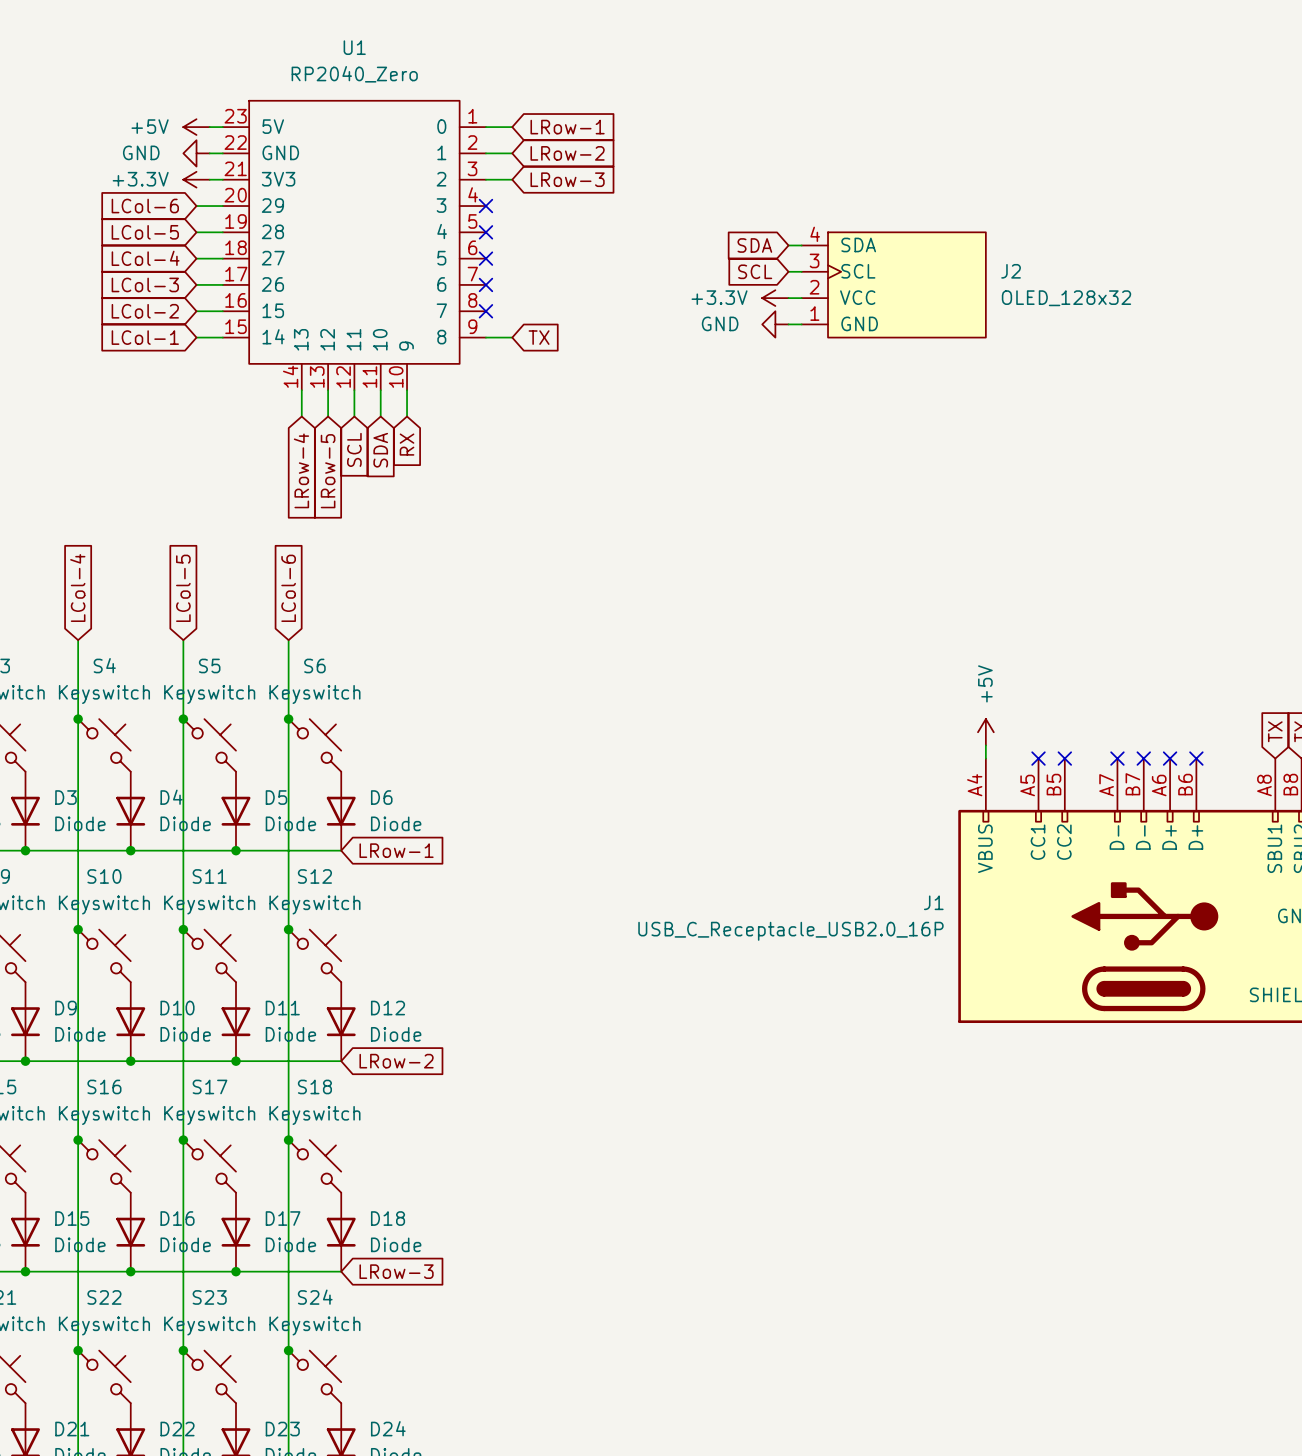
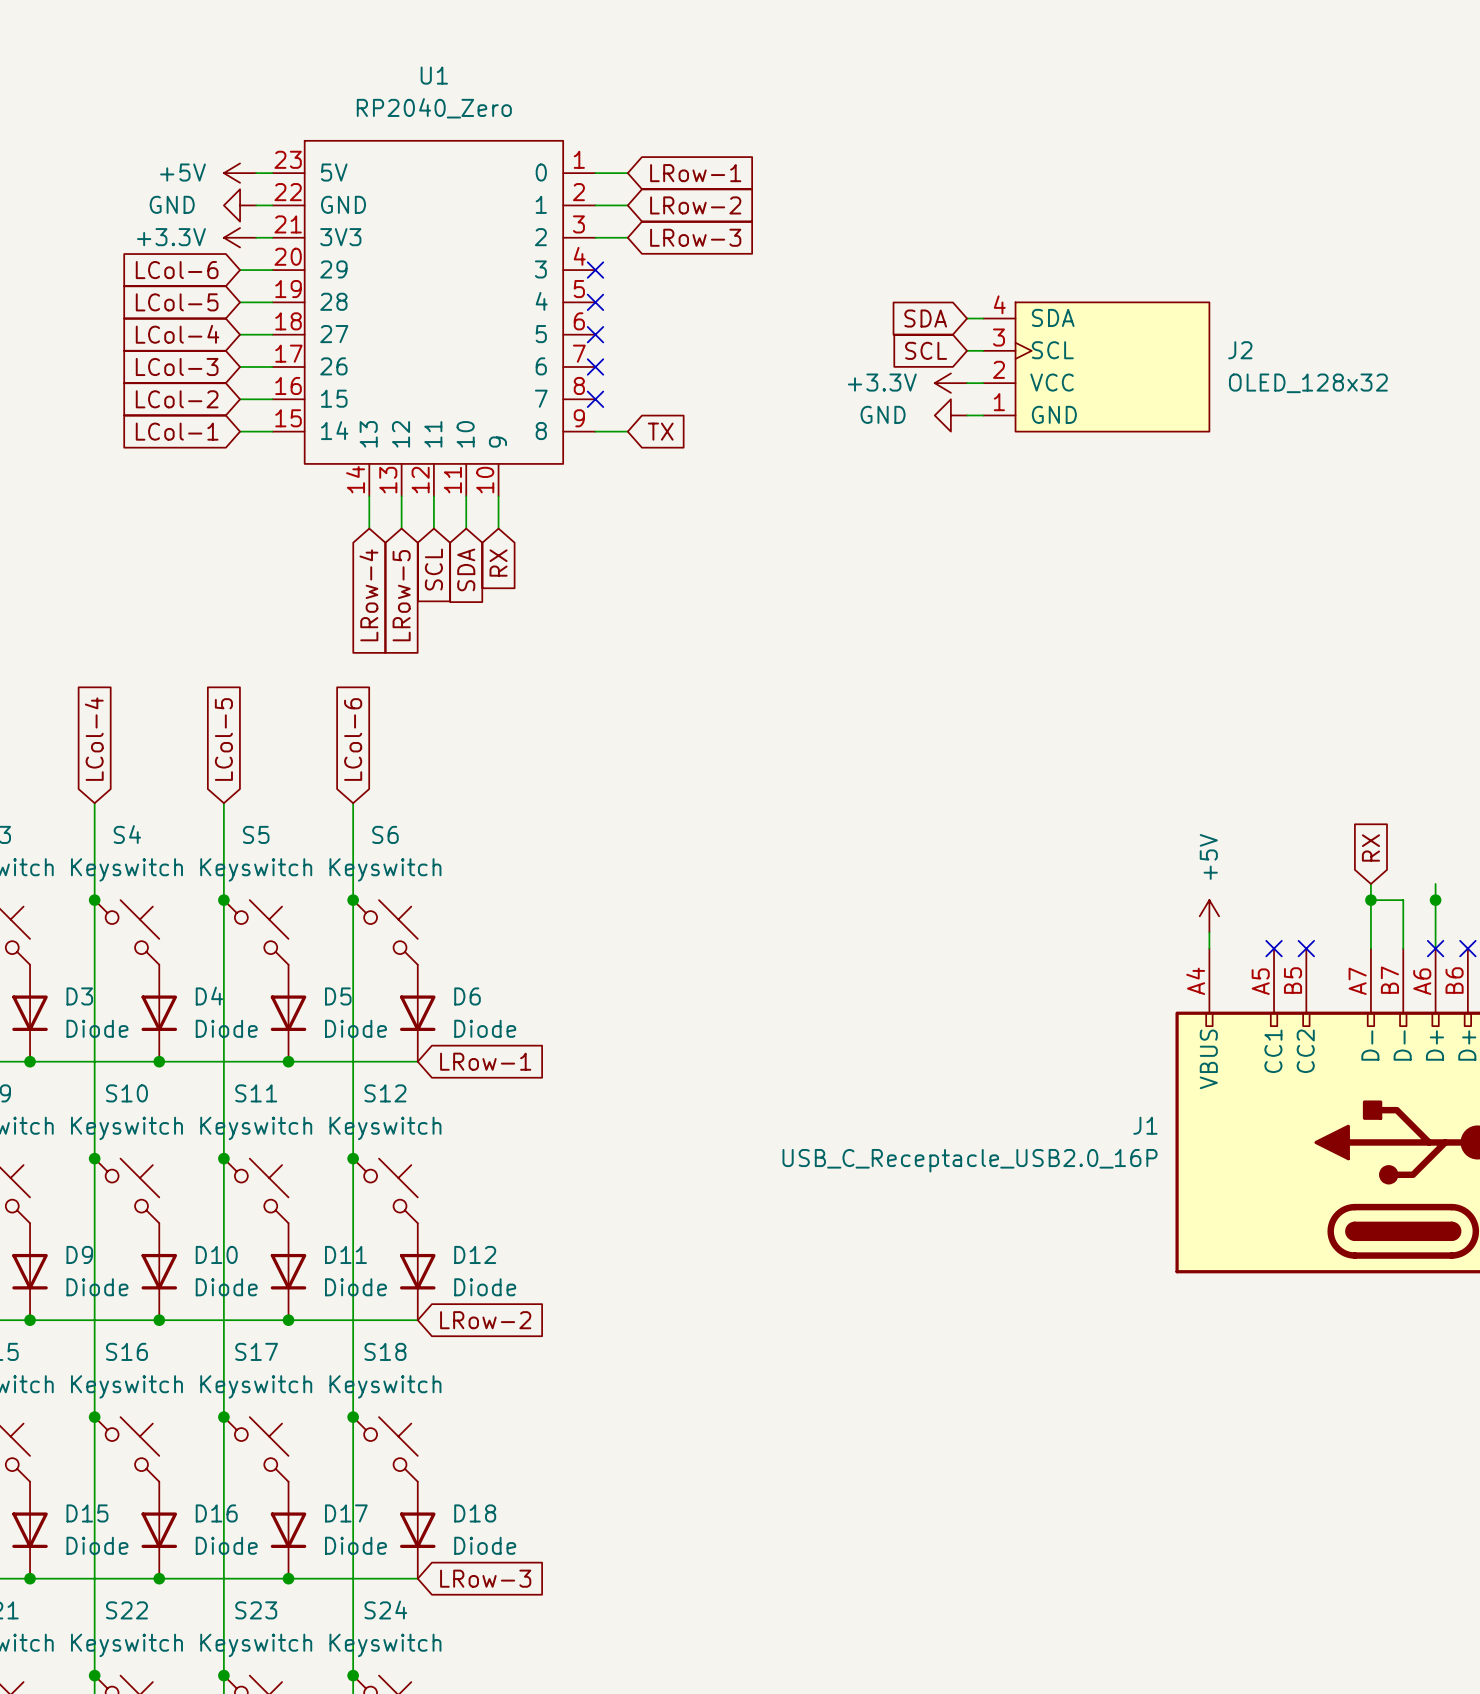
global label: none -> RX (1370, 847)
wire: none -> (1370, 883) (1370, 948)
wire: none -> (1435, 883) (1435, 948)
wire: none -> (1370, 900) (1403, 900) (1403, 948)
junction: none -> (1370, 900)
junction: none -> (1435, 900)
no-connect mark: (1117, 758) -> none
no-connect mark: (1143, 758) -> none

